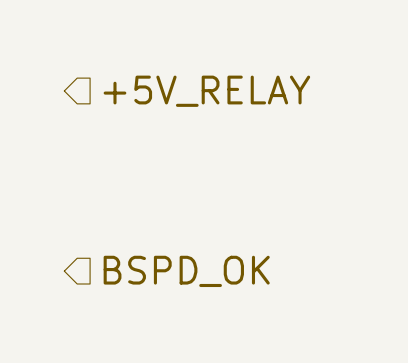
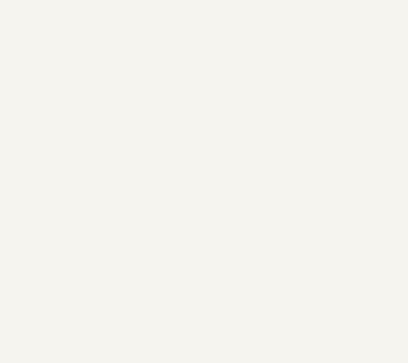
hierarchical label: +5V_RELAY (206, 91) -> none
hierarchical label: BSPD_OK (186, 271) -> none

